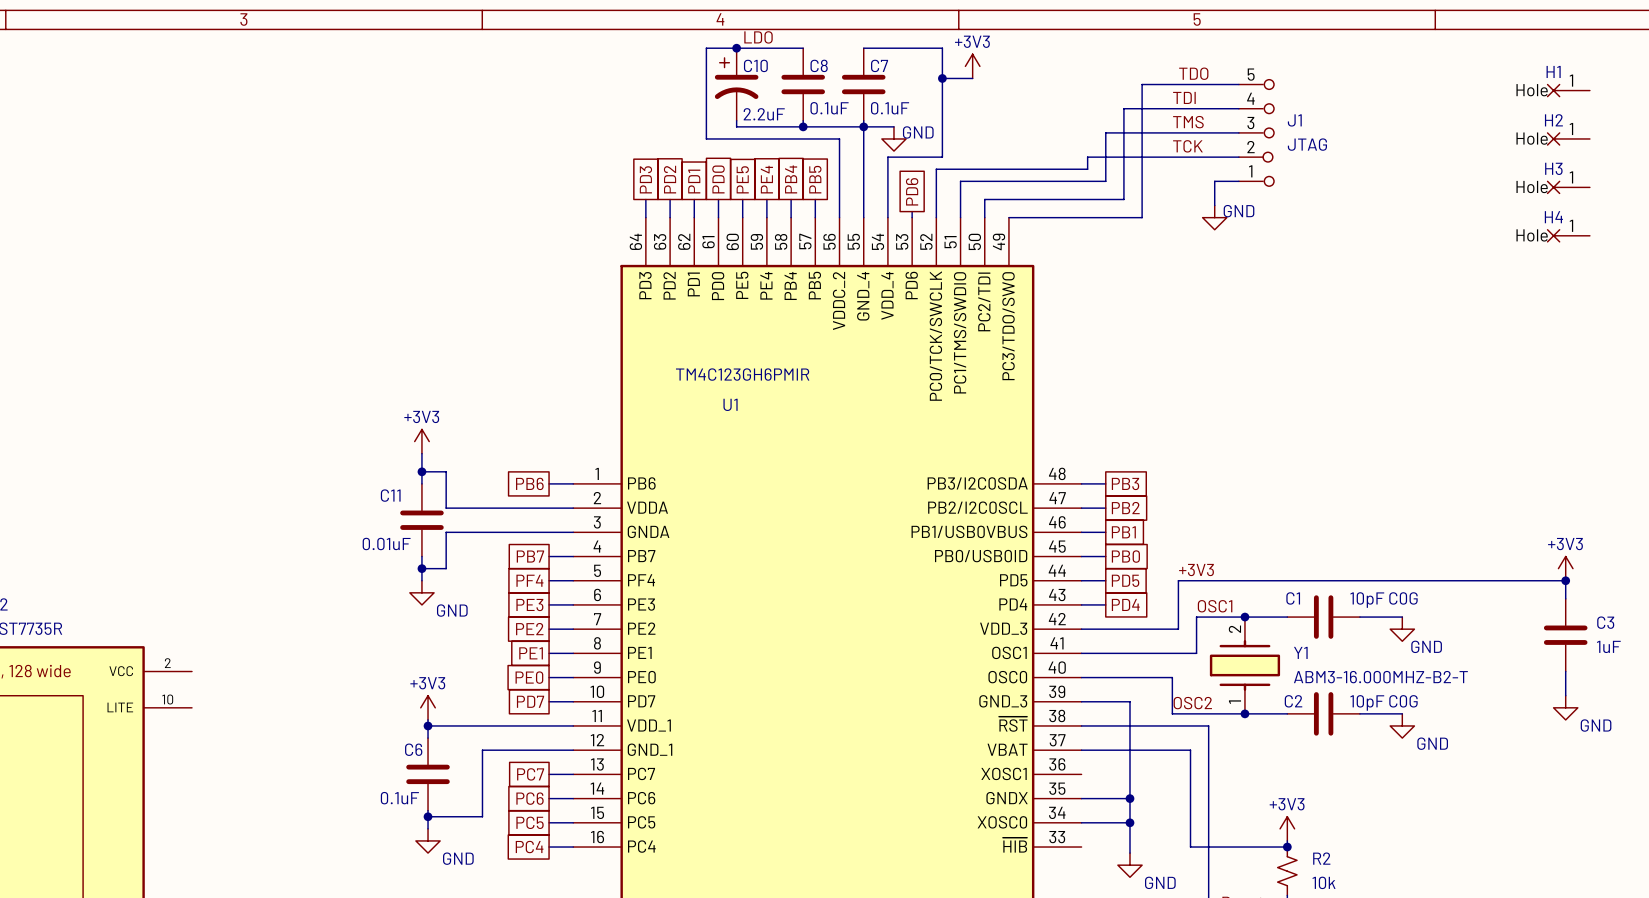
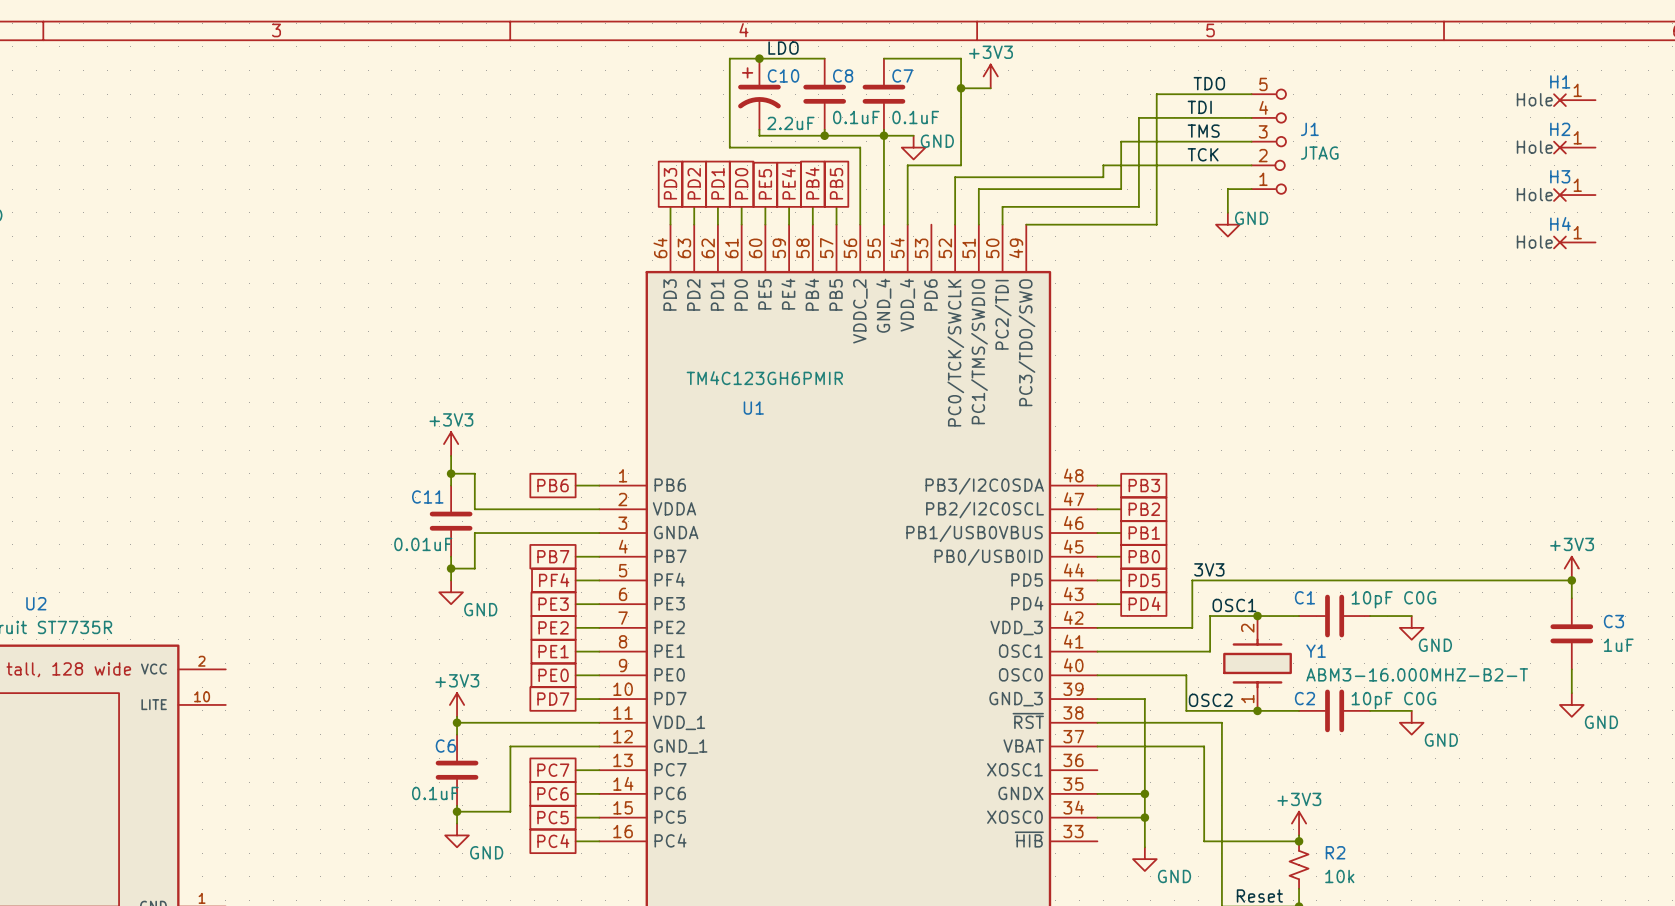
global label: PD6 (912, 191) -> none
wire: (912, 211) (912, 217) -> none
label: +3V3 (1196, 570) -> 3V3 (1209, 569)

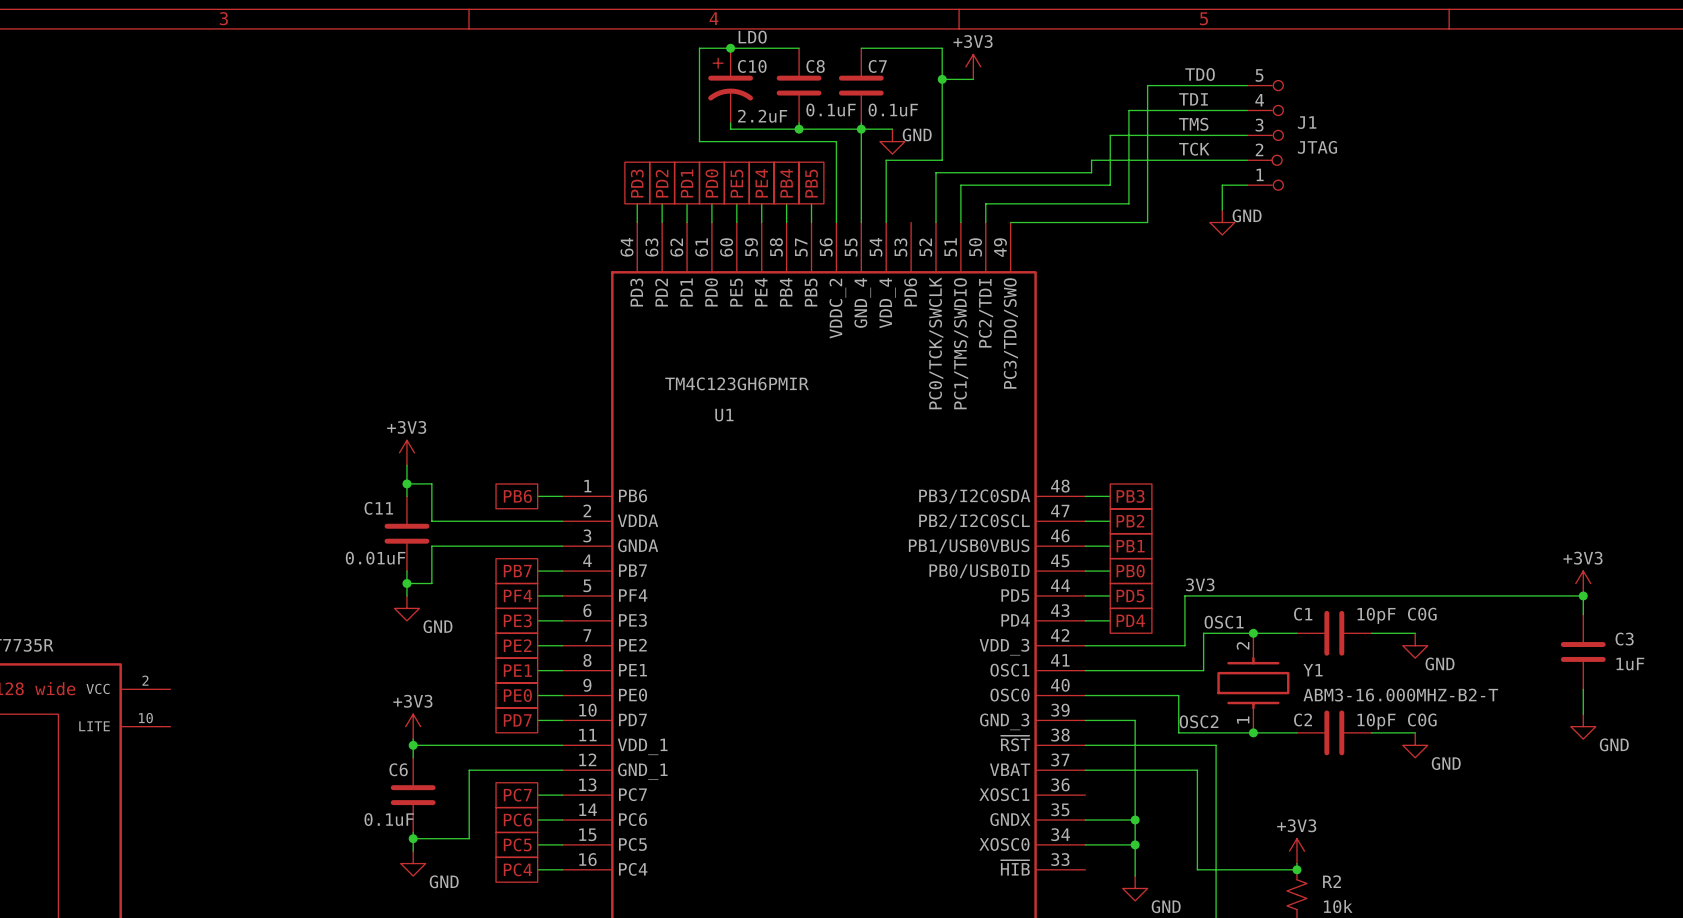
H1: (1574, 100) -> none
H2: (1574, 147) -> none
H3: (1574, 195) -> none
H4: (1574, 242) -> none

